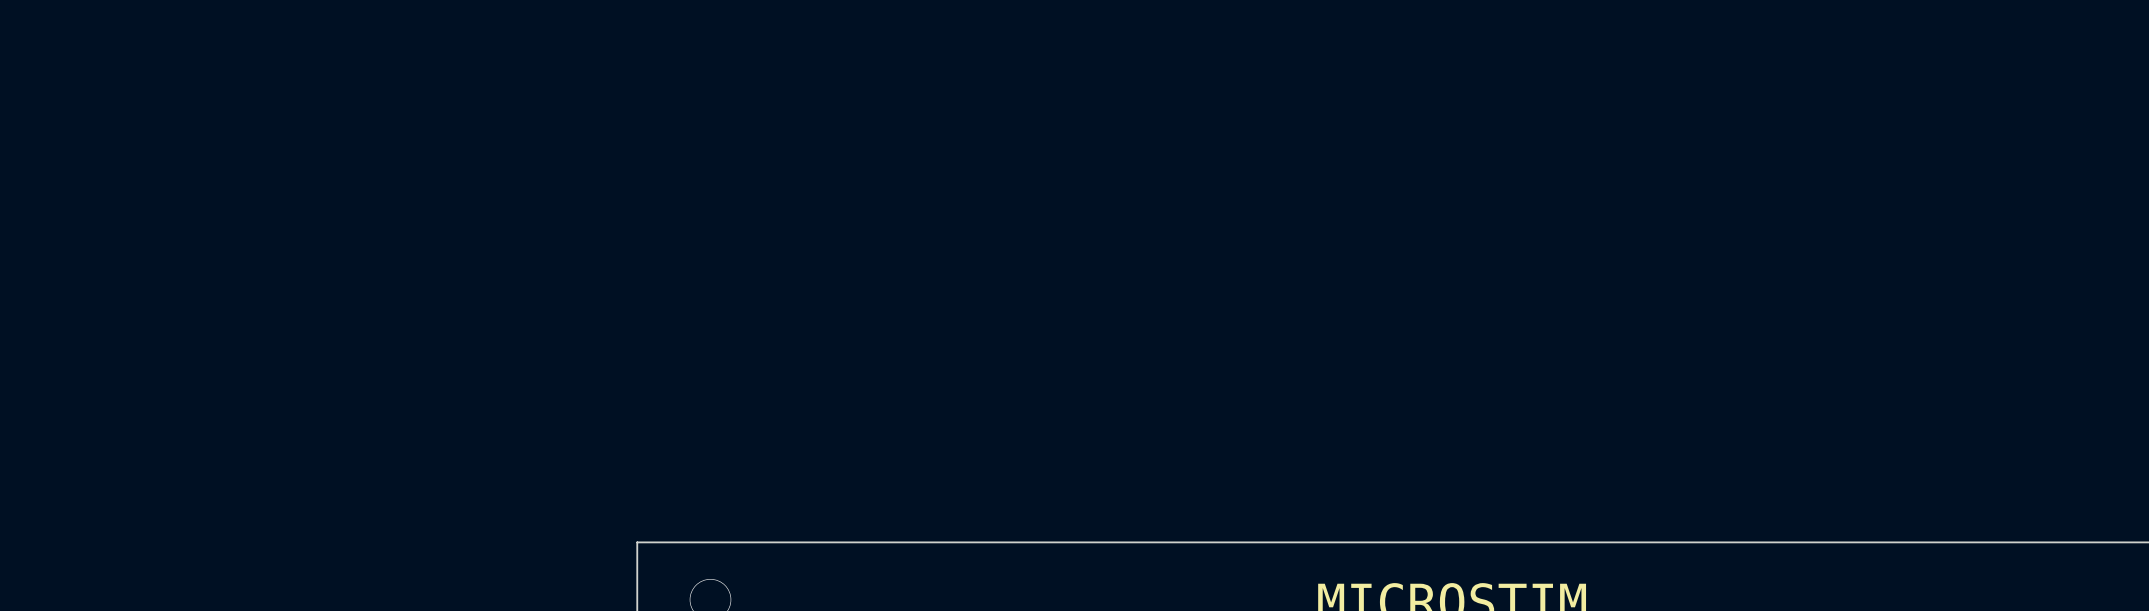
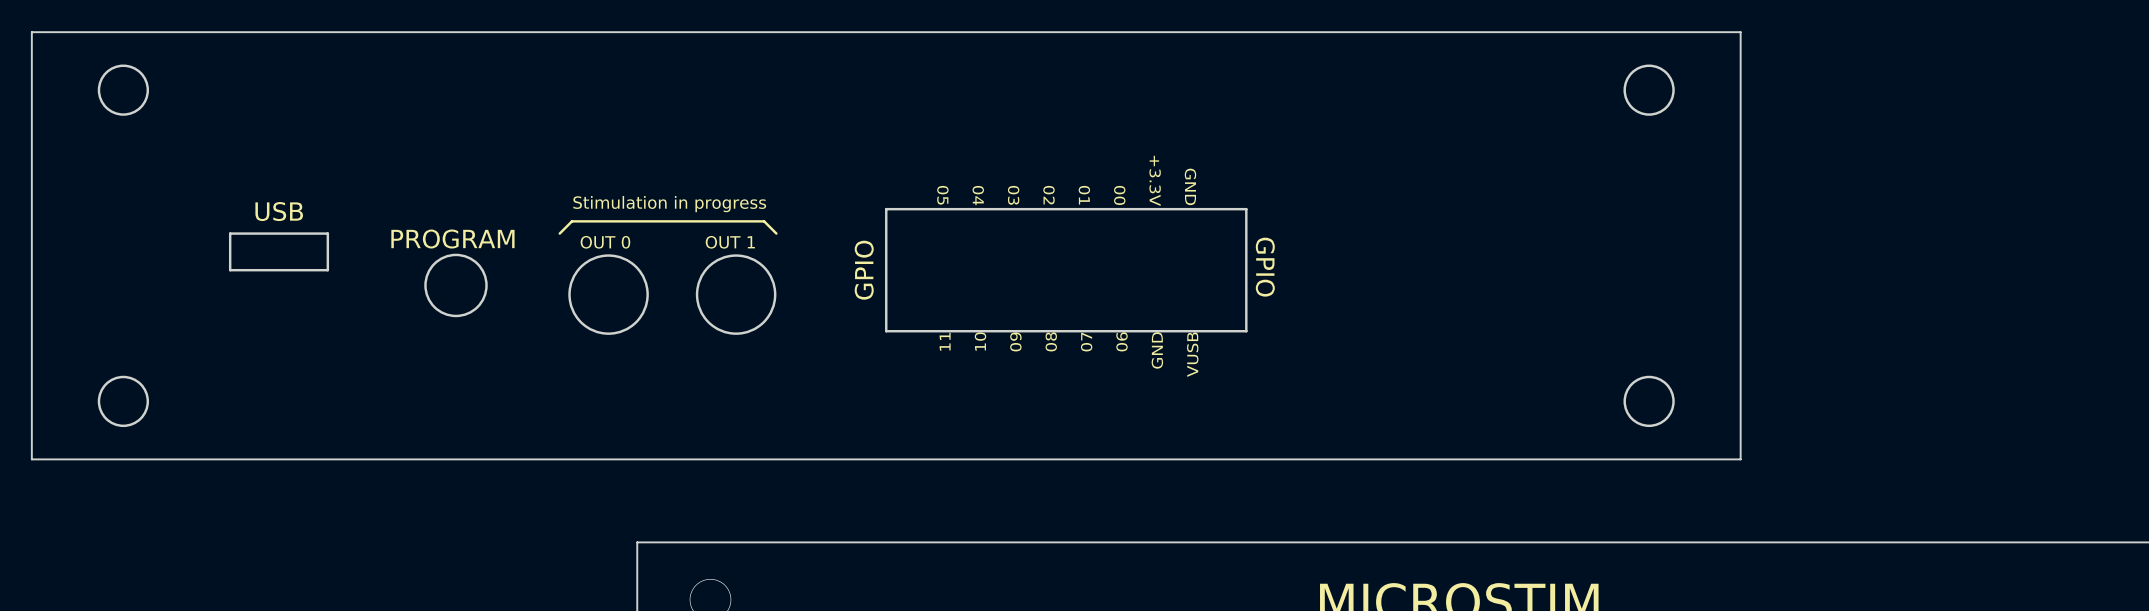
board edge: none -> (31, 32) (31, 459) (1740, 459) (1740, 32) (31, 32)
round board edge: none -> [97, 64, 150, 116]
round board edge: none -> [1623, 64, 1675, 116]
text: none -> +3.3V (1155, 180)
text: none -> GND (1190, 186)
text: none -> 05 (942, 195)
text: none -> 03 (1013, 195)
text: none -> 02 (1049, 195)
text: none -> 04 (978, 195)
text: none -> 01 (1084, 195)
text: none -> 00 (1119, 195)
text: none -> Stimulation in progress (669, 204)
board edge: none -> (886, 209) (1246, 209) (1246, 331) (886, 331) (886, 209)
text: none -> USB (279, 211)
board edge: none -> (230, 233) (327, 233) (327, 270) (230, 270) (230, 233)
line: none -> (559, 233) (571, 221) (764, 221) (776, 233)
text: none -> PROGRAM (452, 239)
text: none -> OUT 0 (605, 242)
text: none -> OUT 1 (730, 242)
round board edge: none -> [424, 253, 488, 318]
round board edge: none -> [568, 254, 649, 335]
round board edge: none -> [695, 254, 777, 335]
text: none -> GPIO (1265, 267)
text: none -> GPIO (864, 270)
text: none -> 11 (945, 341)
text: none -> 10 (980, 341)
text: none -> 09 (1015, 341)
text: none -> 08 (1051, 341)
text: none -> 07 (1086, 342)
text: none -> 06 (1121, 341)
text: none -> GND (1157, 350)
text: none -> VUSB (1192, 354)
round board edge: none -> [97, 375, 150, 428]
round board edge: none -> [1623, 375, 1675, 428]

